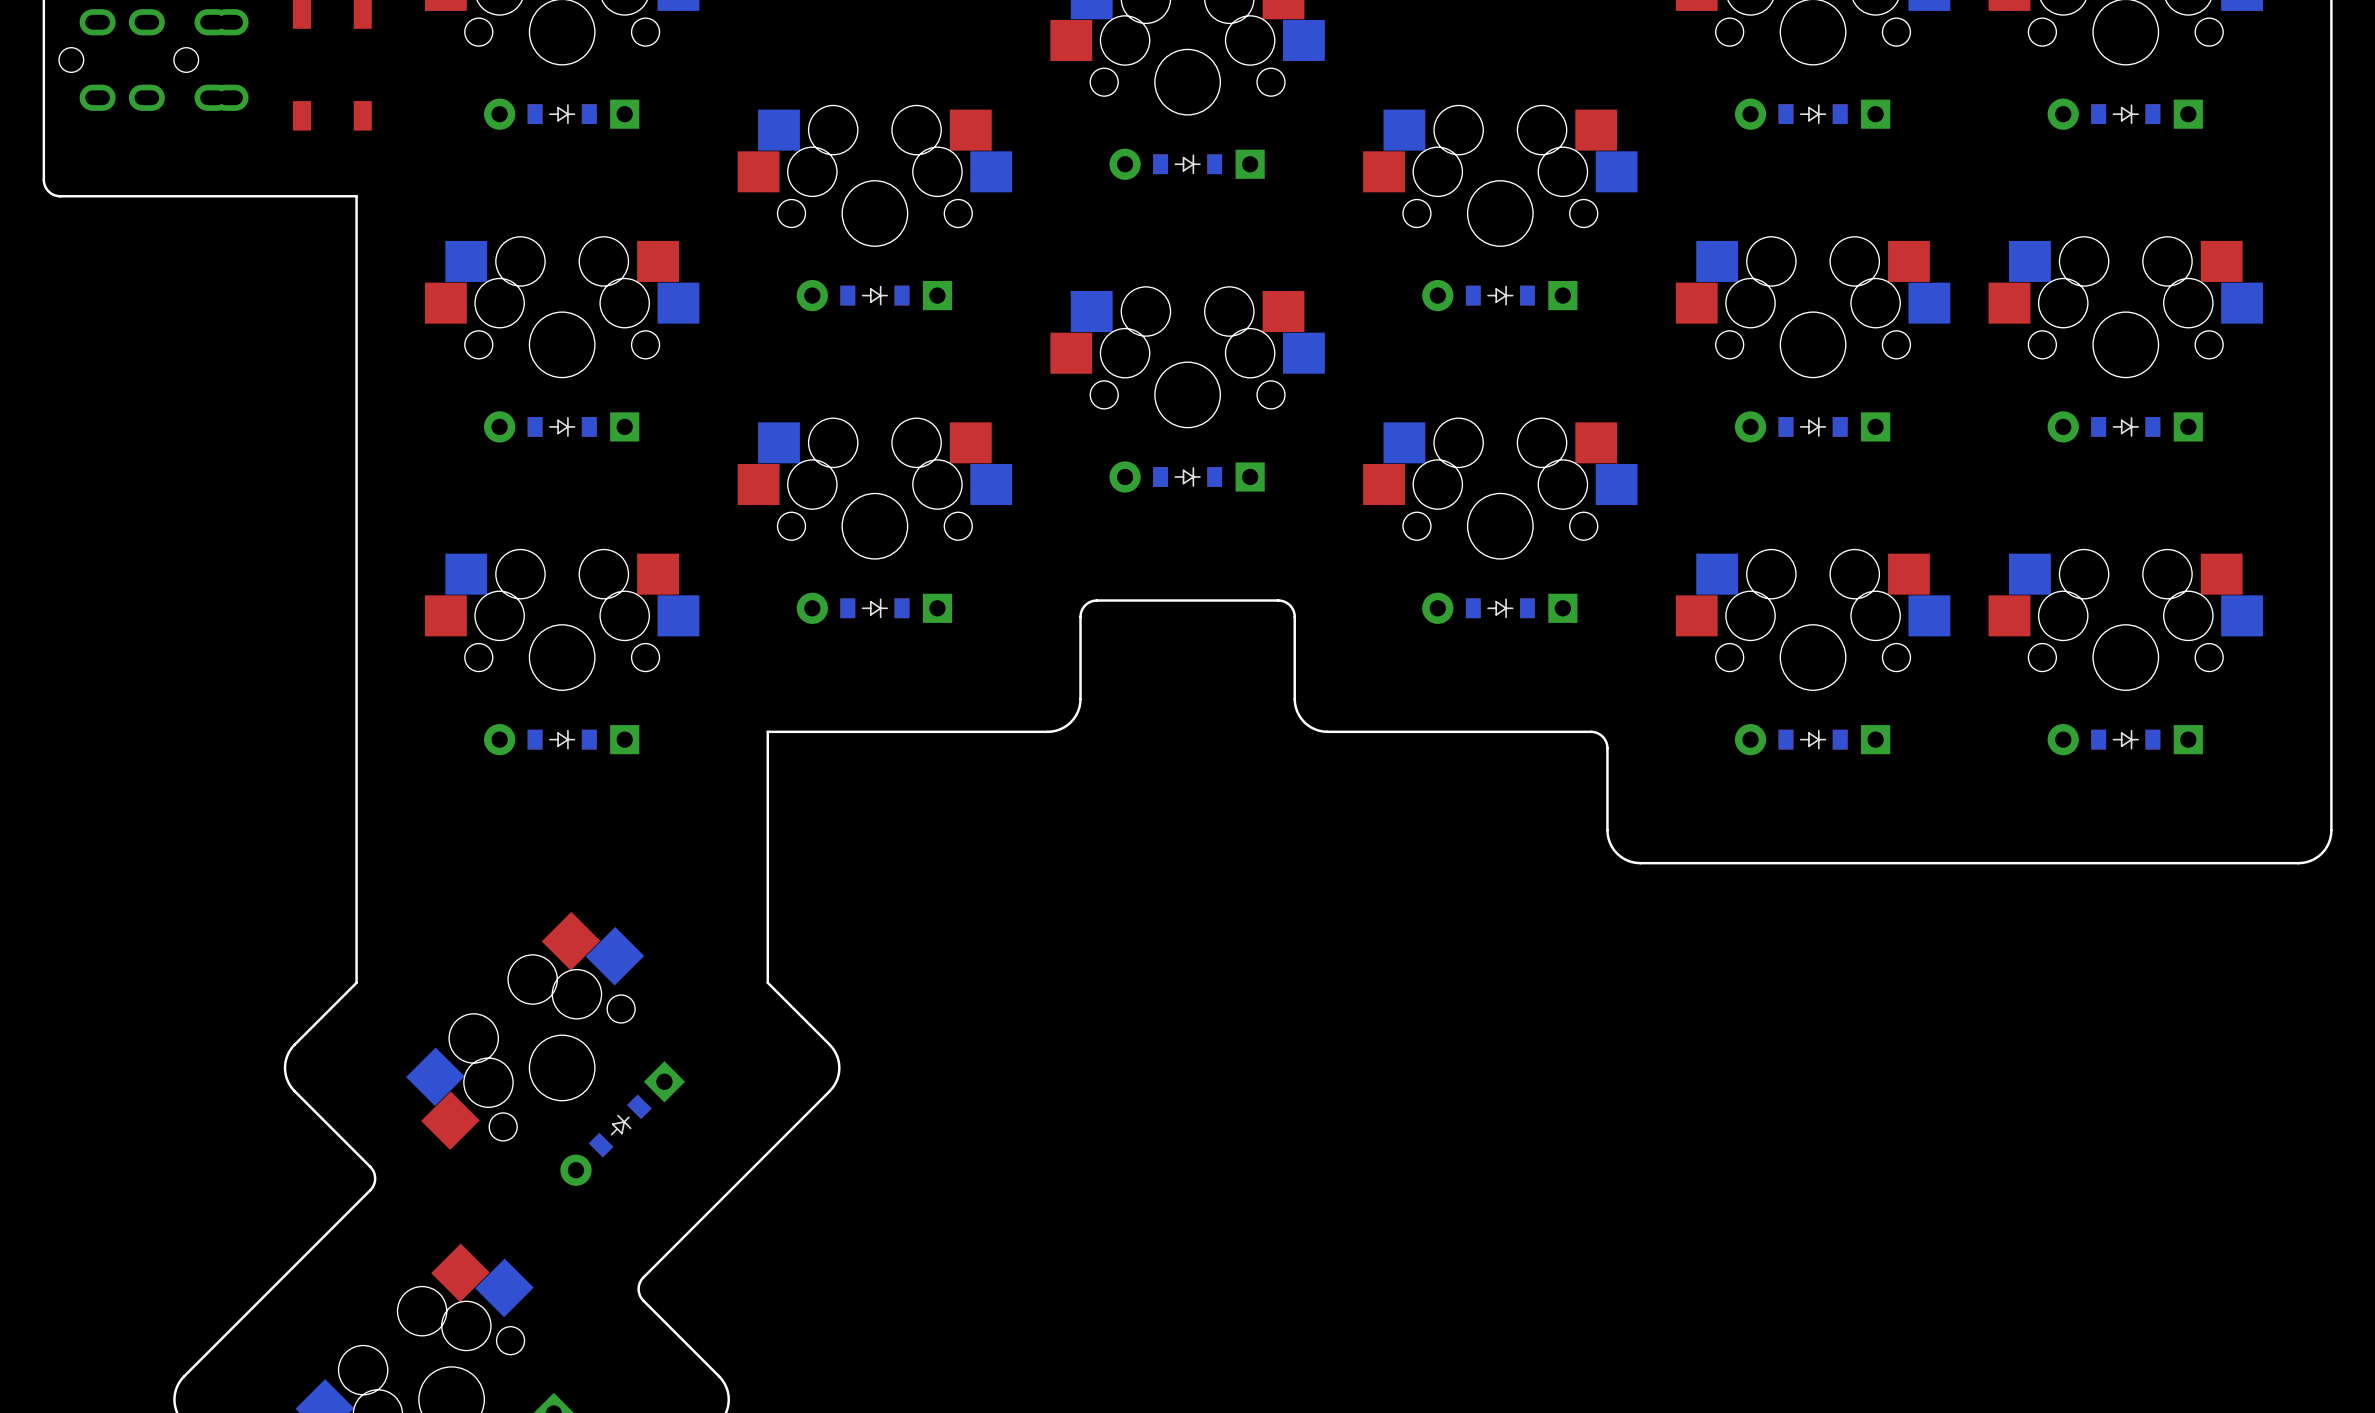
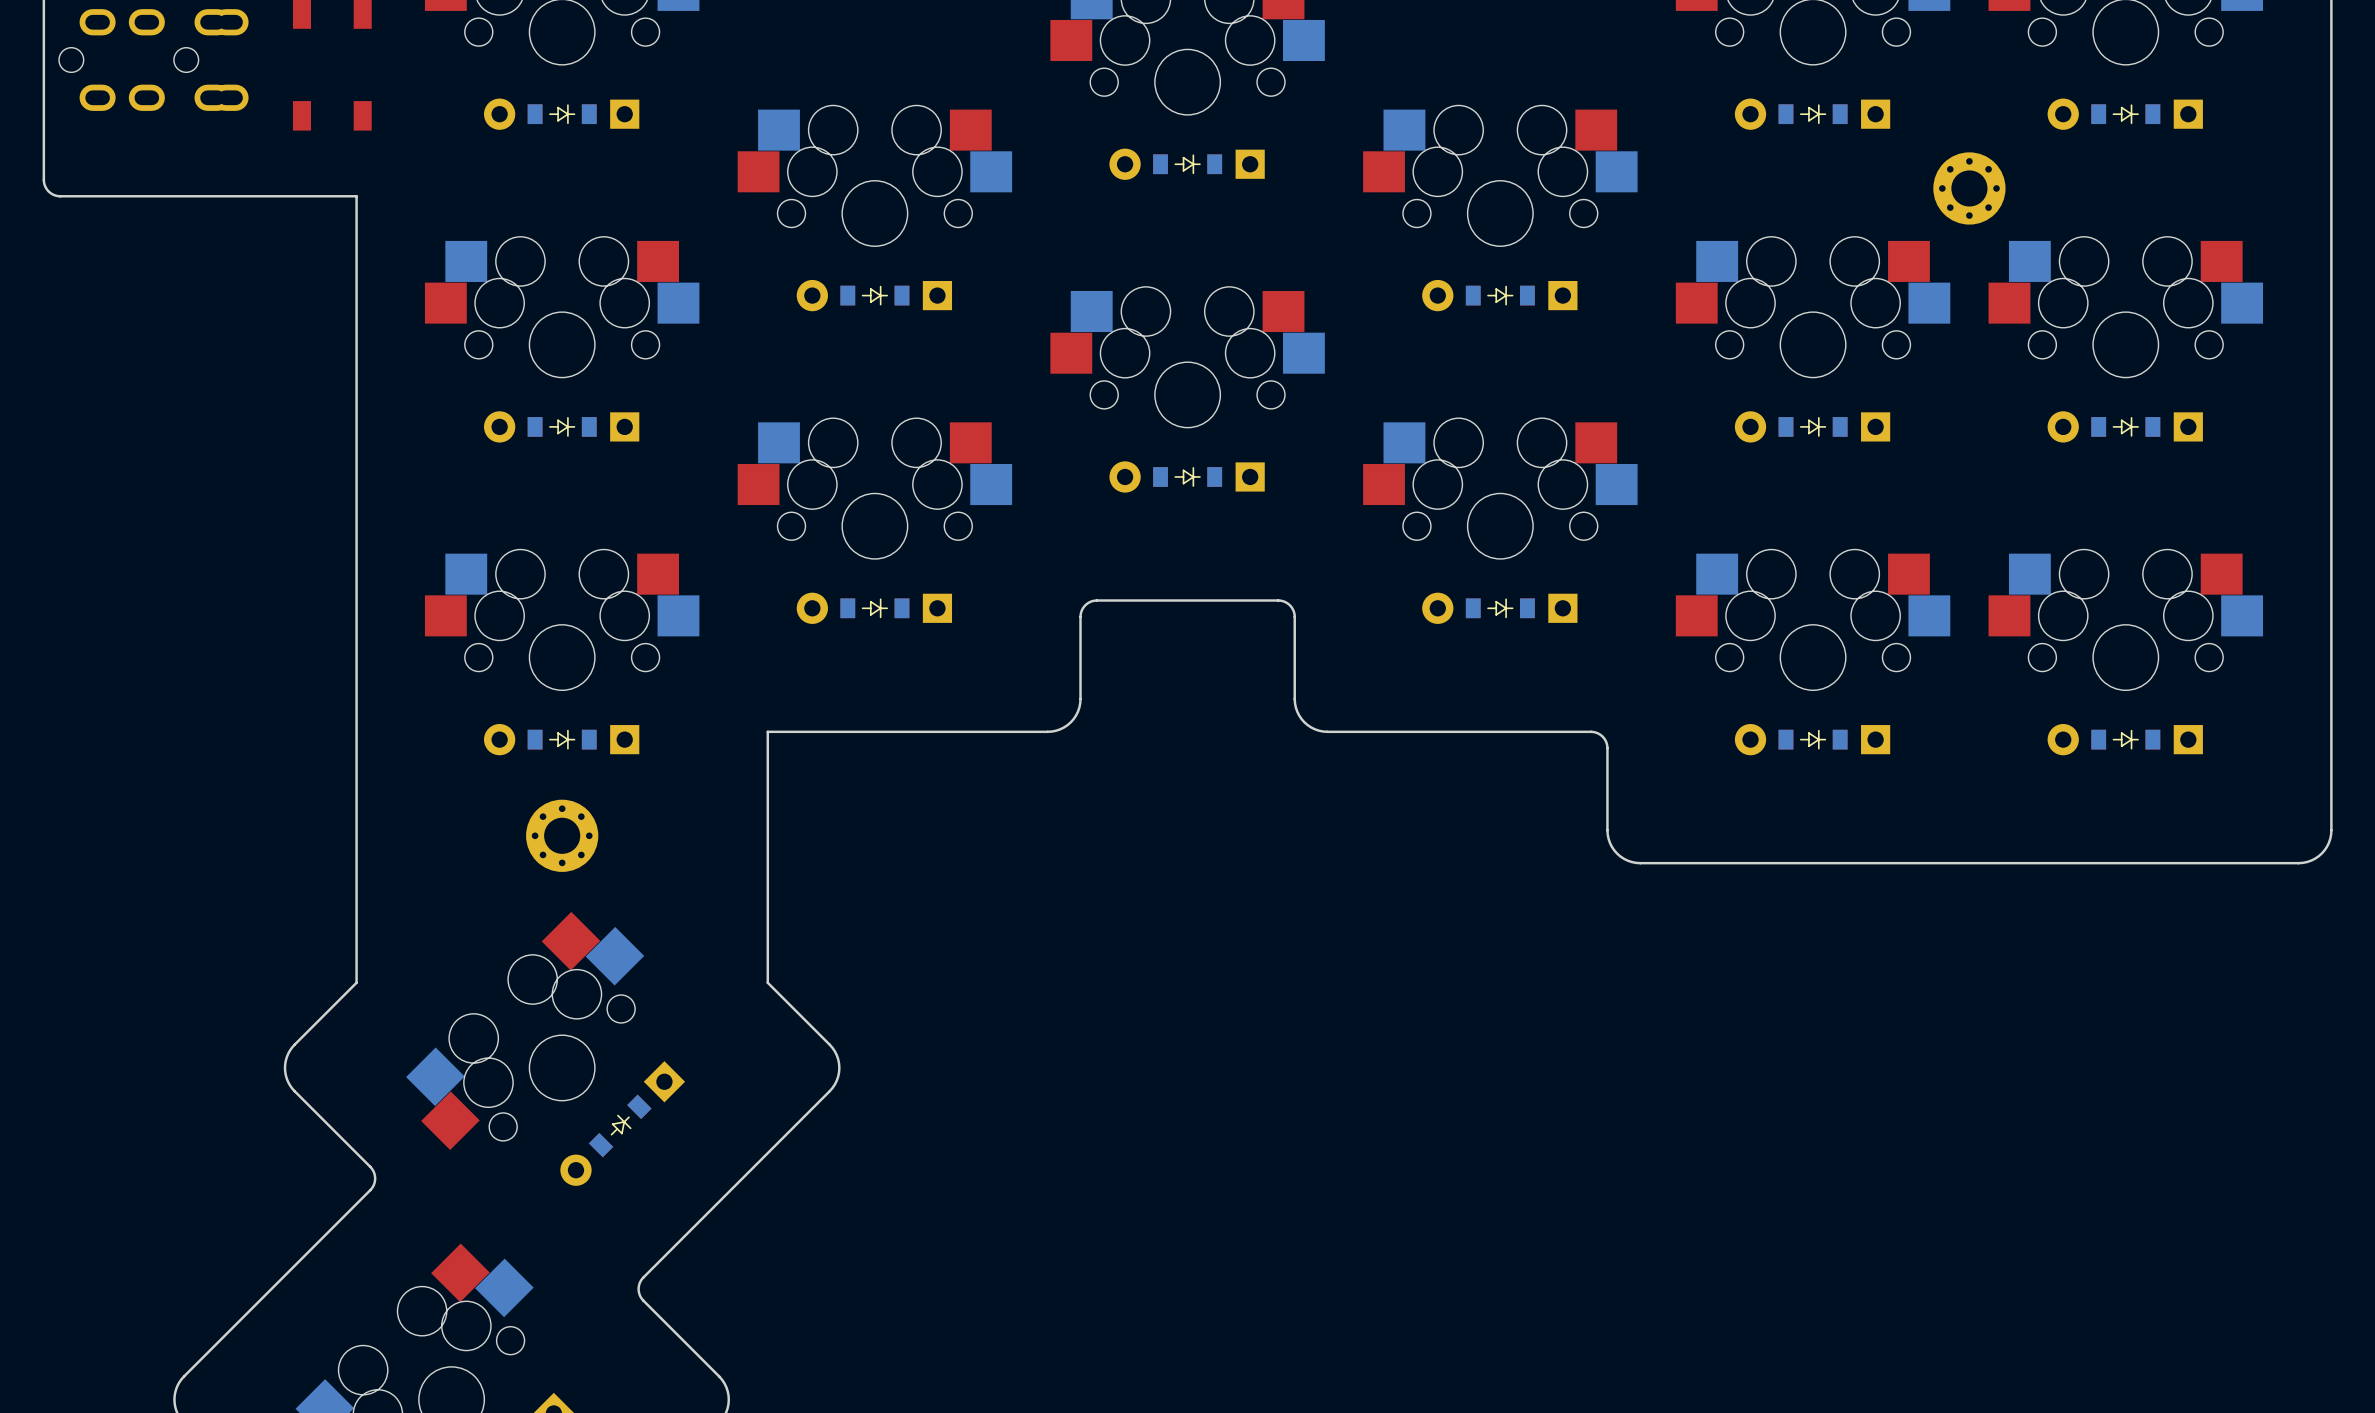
part: none -> (1969, 188)
part: none -> (562, 835)

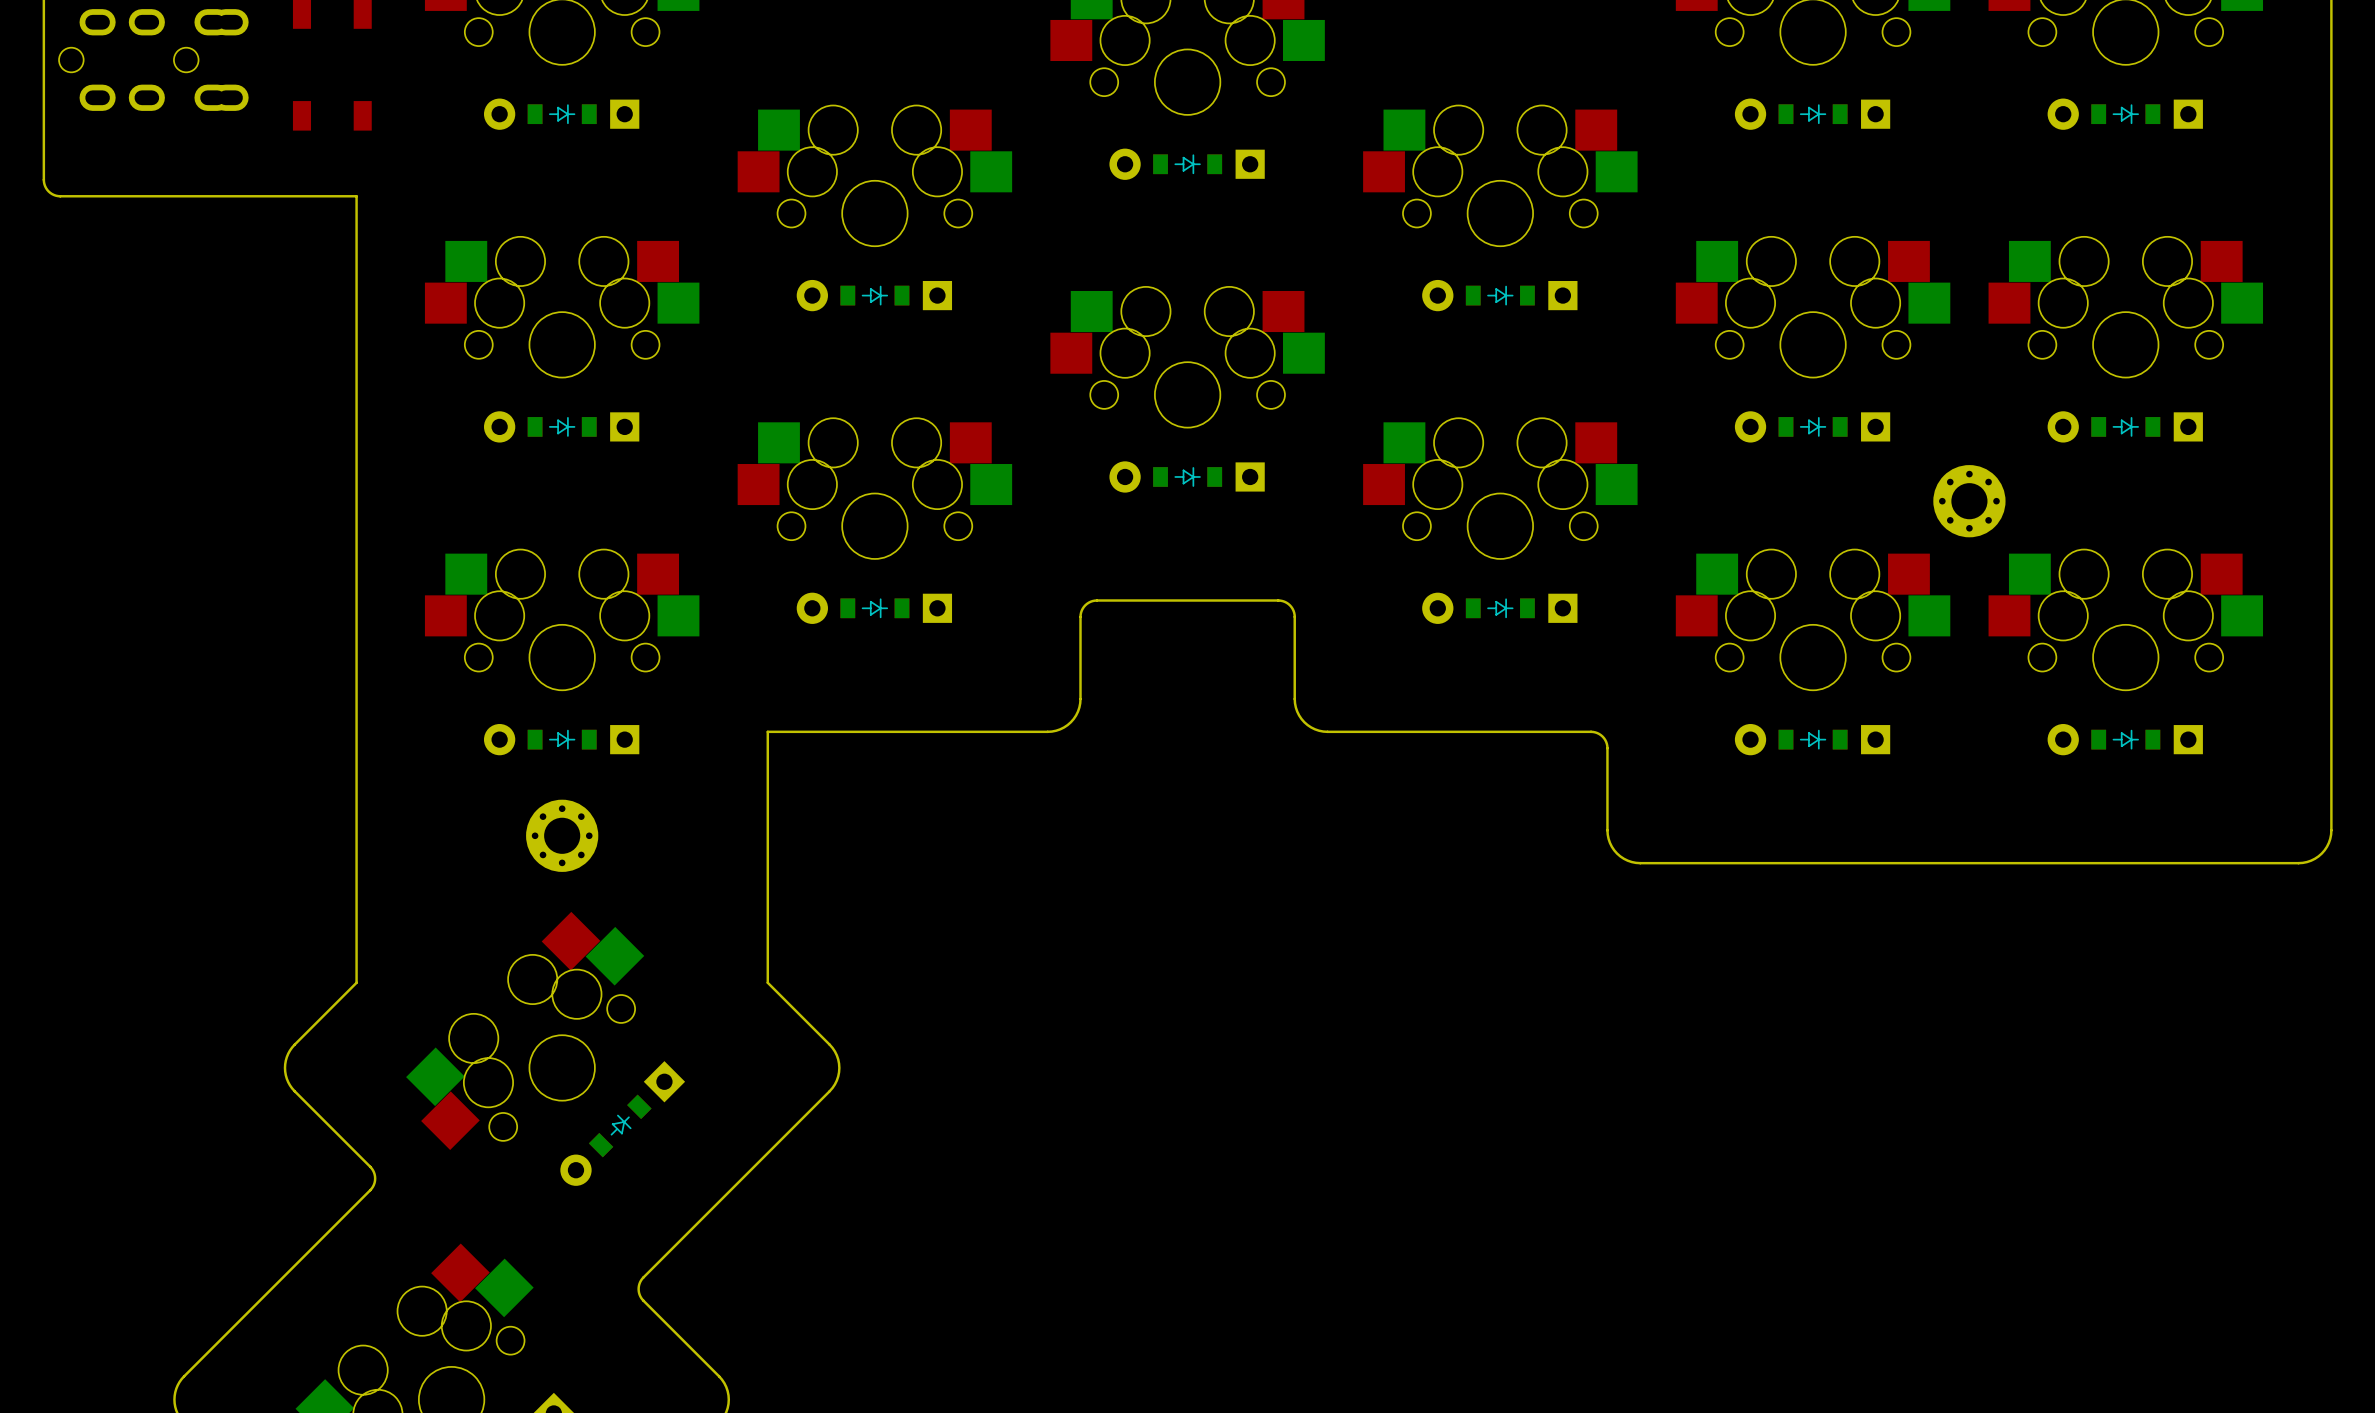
part position: (1969, 188) -> (1969, 501)

